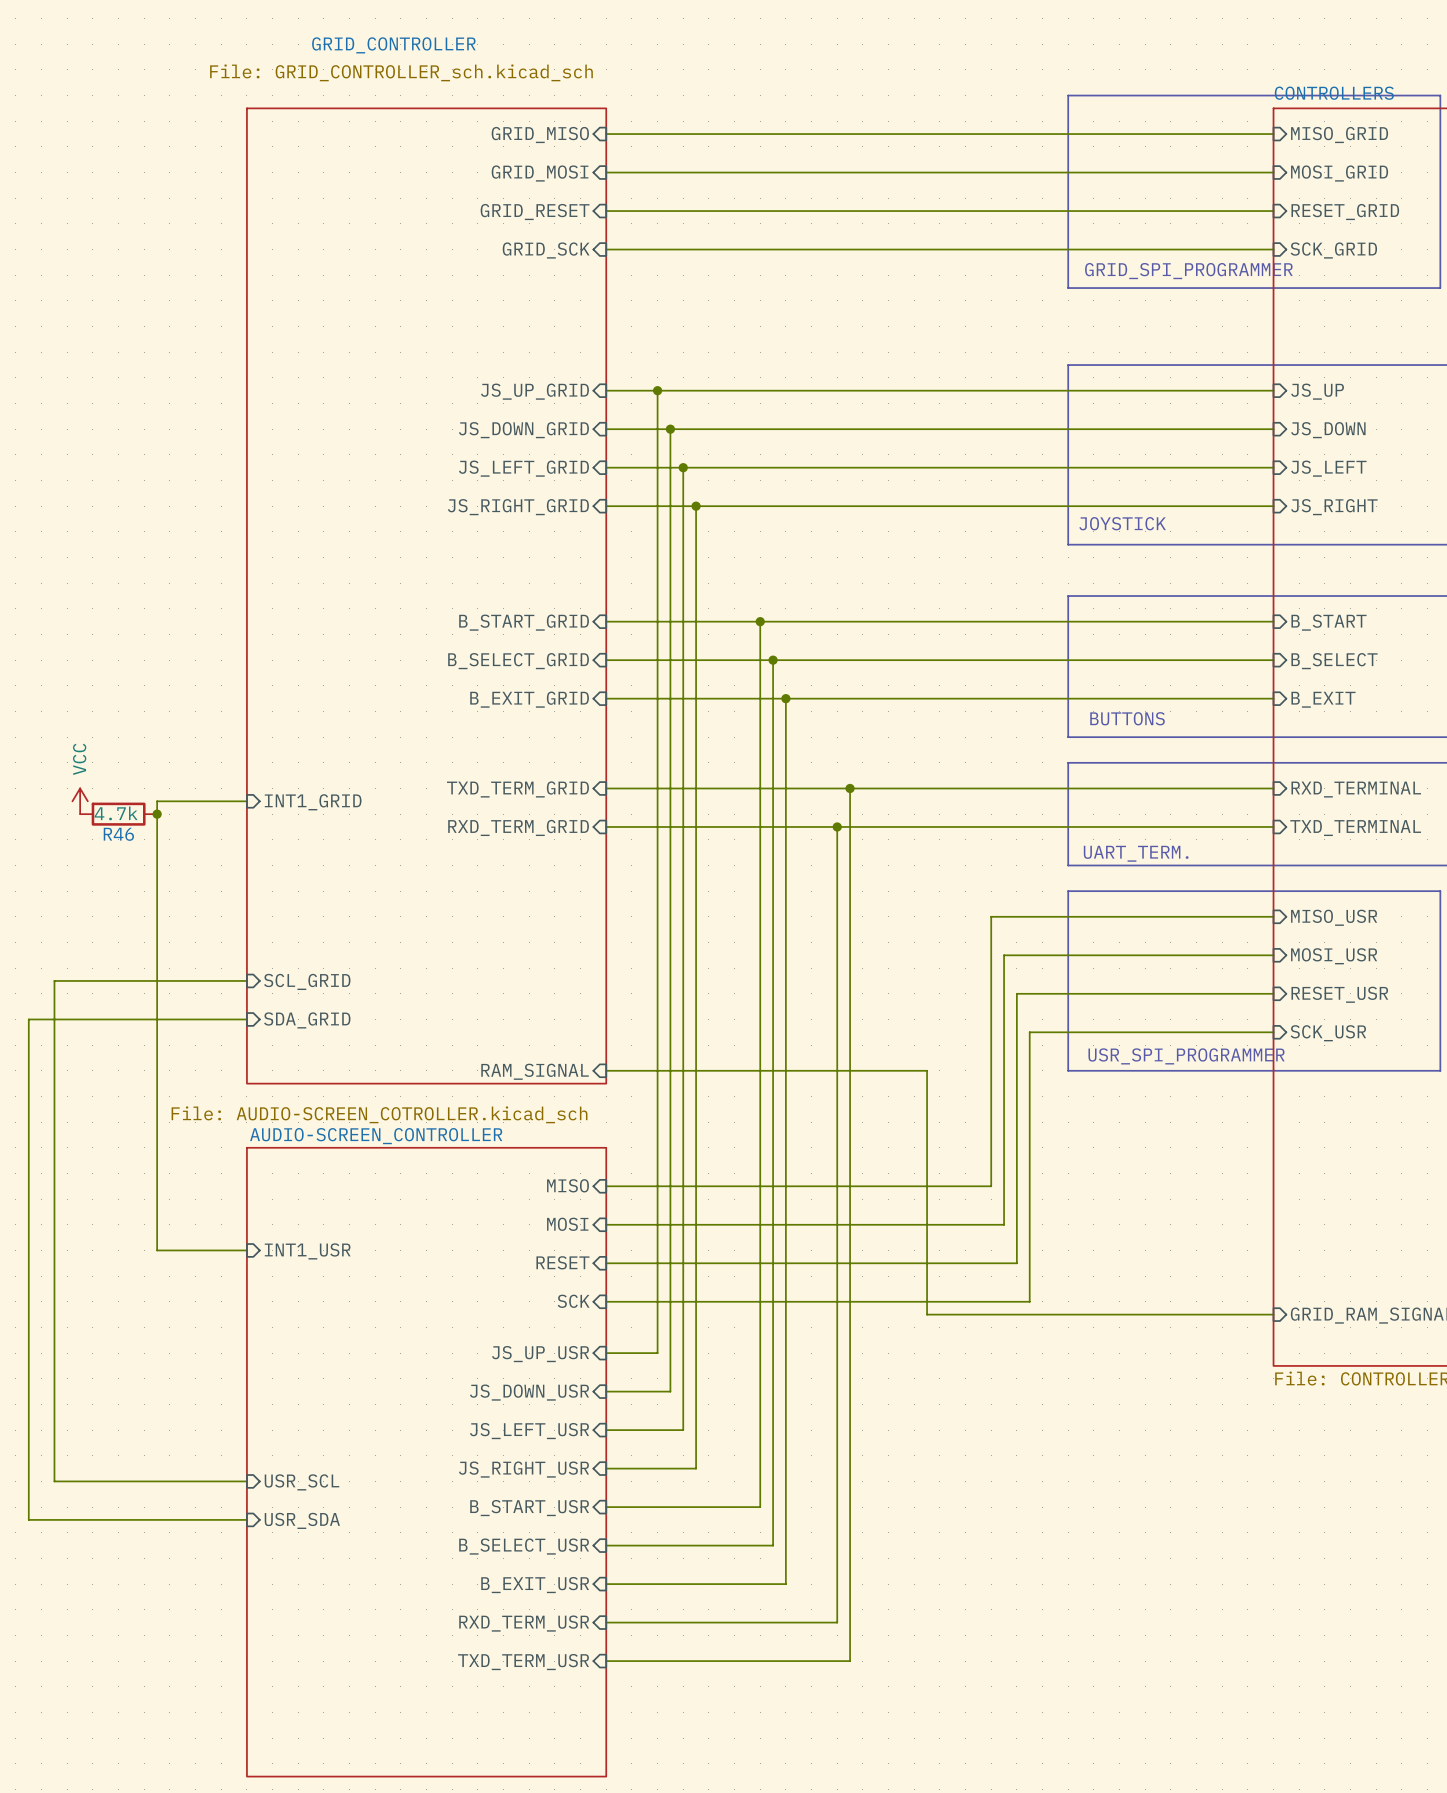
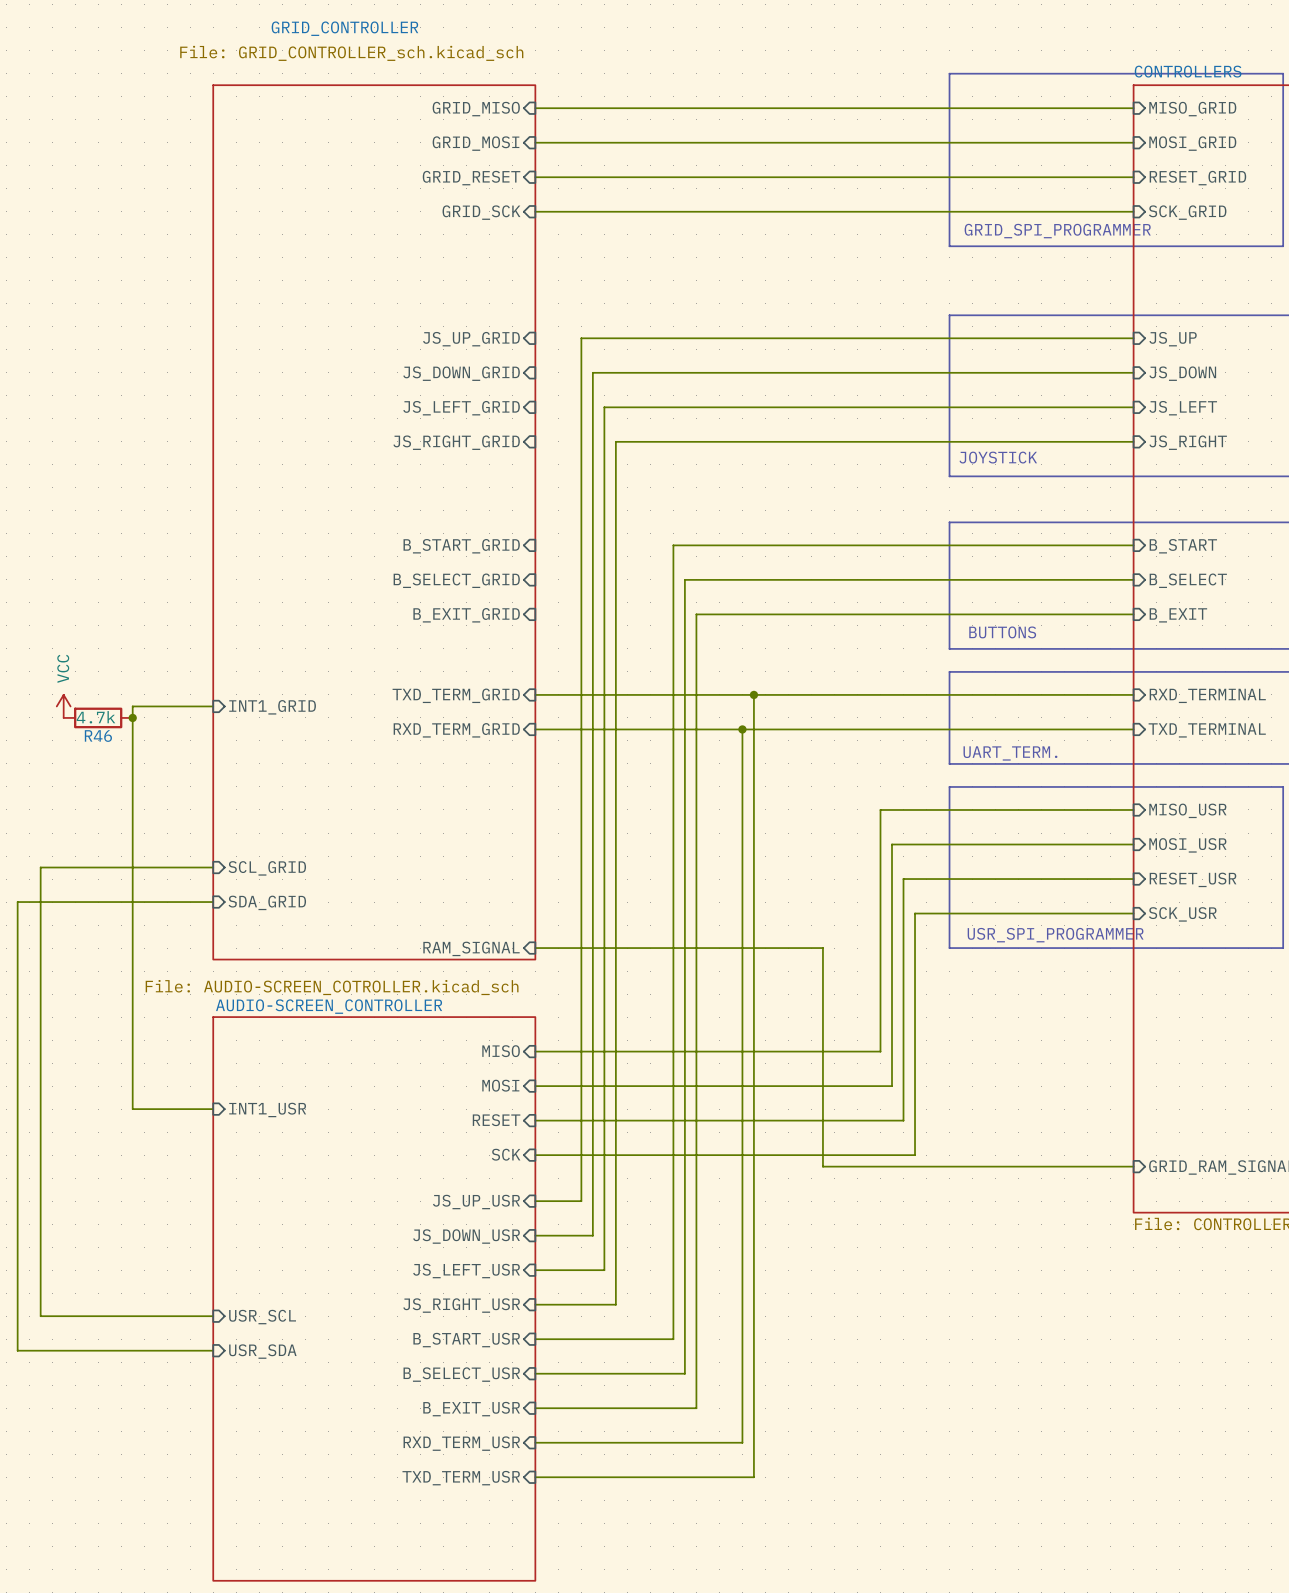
wire: (606, 390) (657, 390) -> none
junction: (657, 390) -> none
wire: (606, 429) (670, 429) -> none
junction: (670, 429) -> none
wire: (606, 467) (683, 467) -> none
junction: (683, 467) -> none
wire: (606, 506) (696, 506) -> none
junction: (696, 506) -> none
wire: (606, 621) (760, 621) -> none
junction: (760, 621) -> none
wire: (606, 660) (773, 660) -> none
junction: (773, 660) -> none
wire: (606, 698) (785, 698) -> none
junction: (785, 698) -> none

